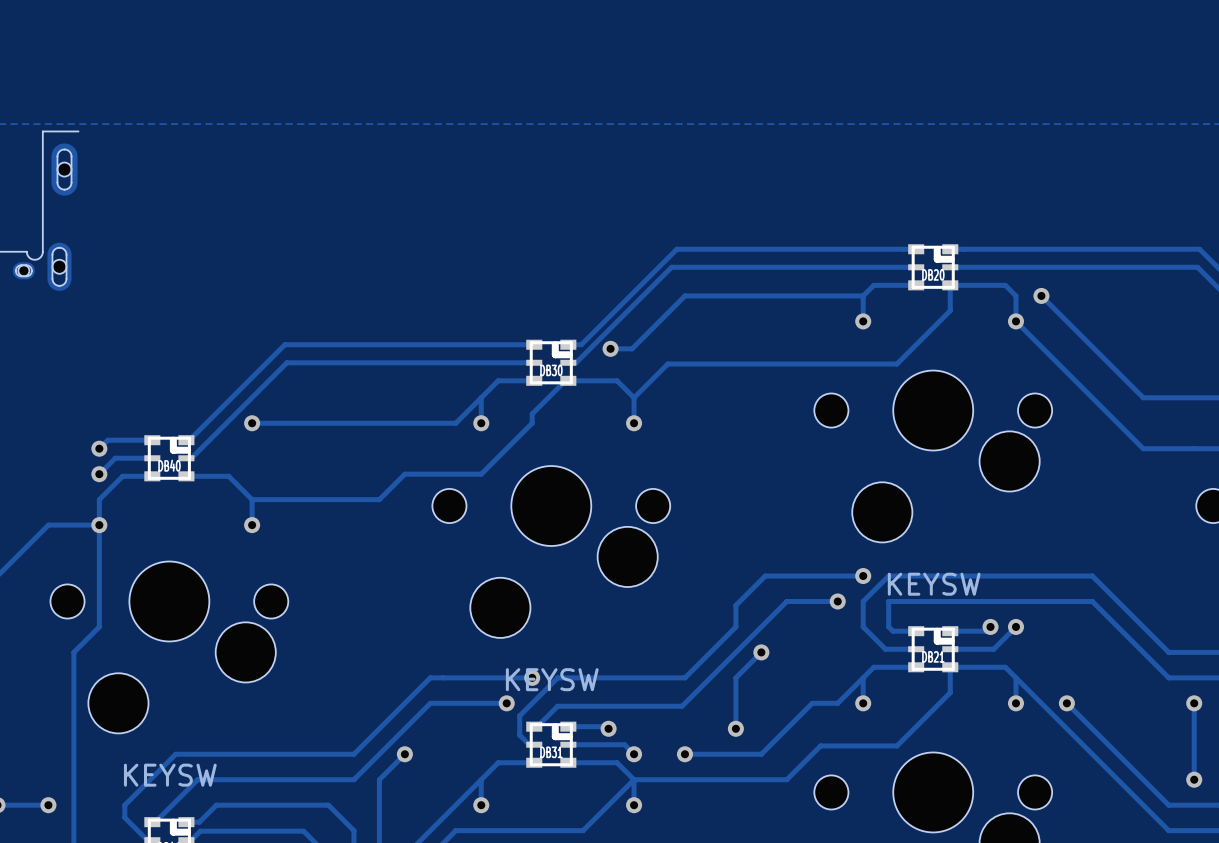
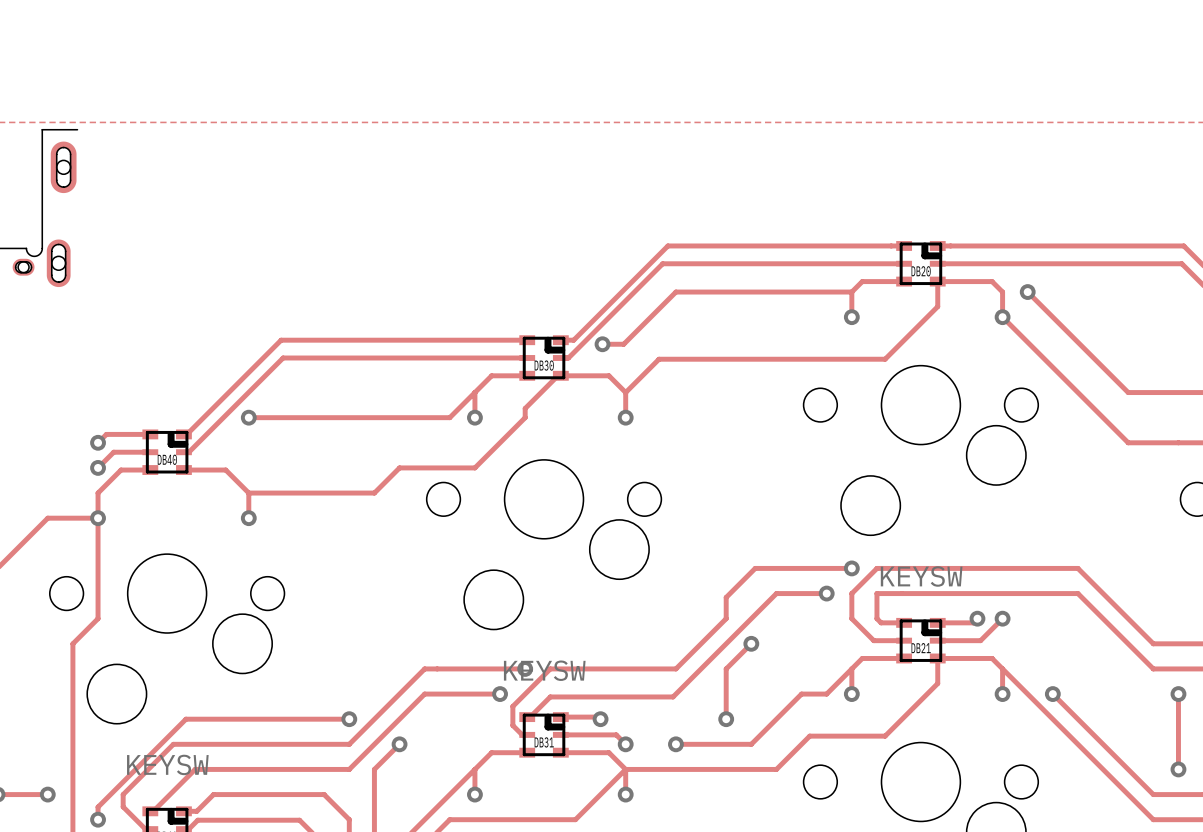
track: none -> (349, 719) (185, 719) (98, 807) (98, 819)
via: none -> (349, 719)
via: none -> (98, 819)

